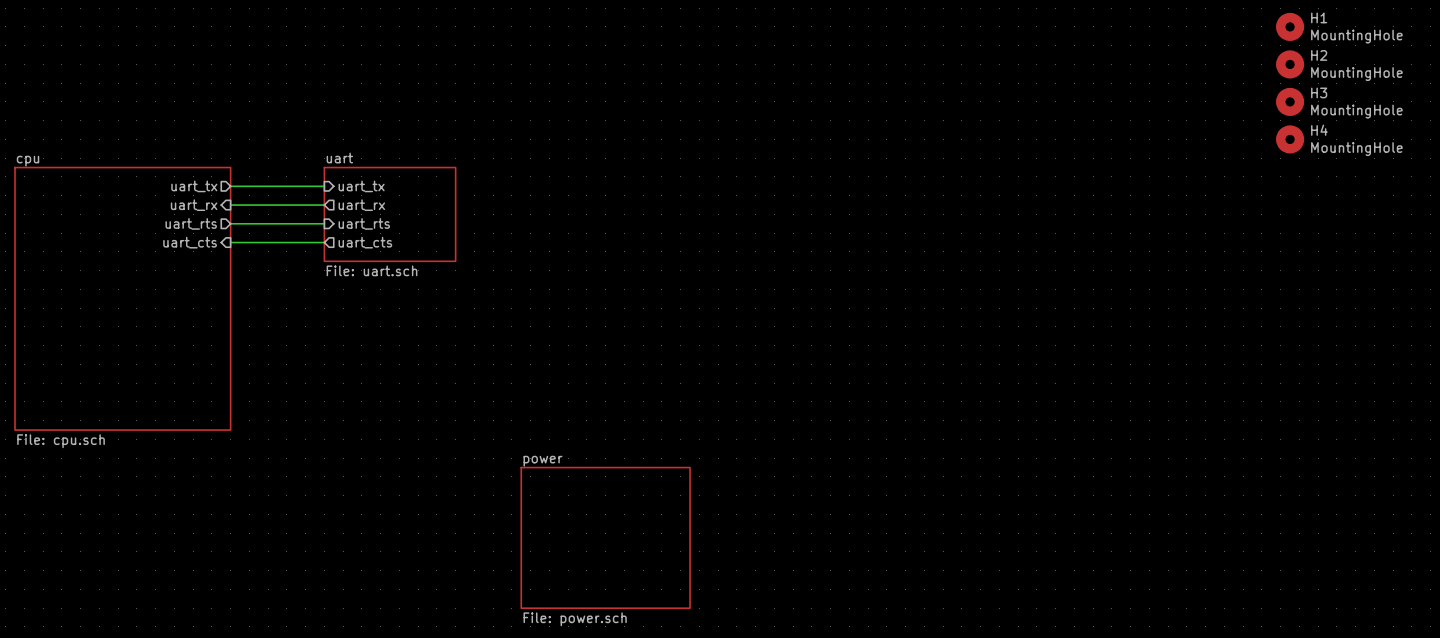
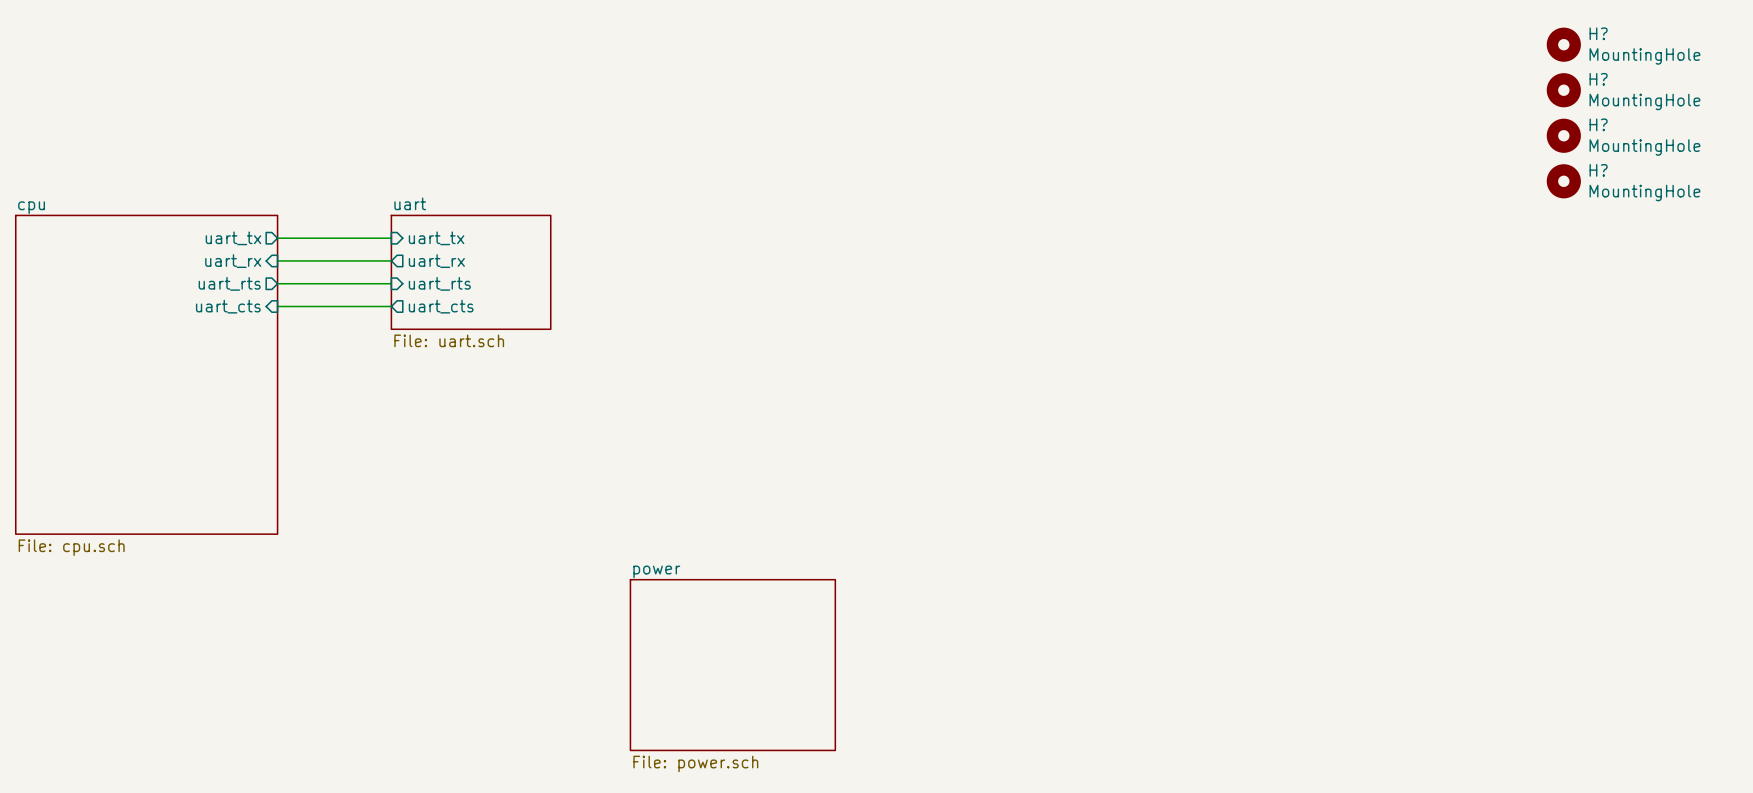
H1 name: H1 (1319, 17) -> H? (1598, 33)
H2 name: H2 (1319, 55) -> H? (1598, 79)
H3 name: H3 (1319, 92) -> H? (1598, 124)
H4 name: H4 (1319, 130) -> H? (1598, 170)

